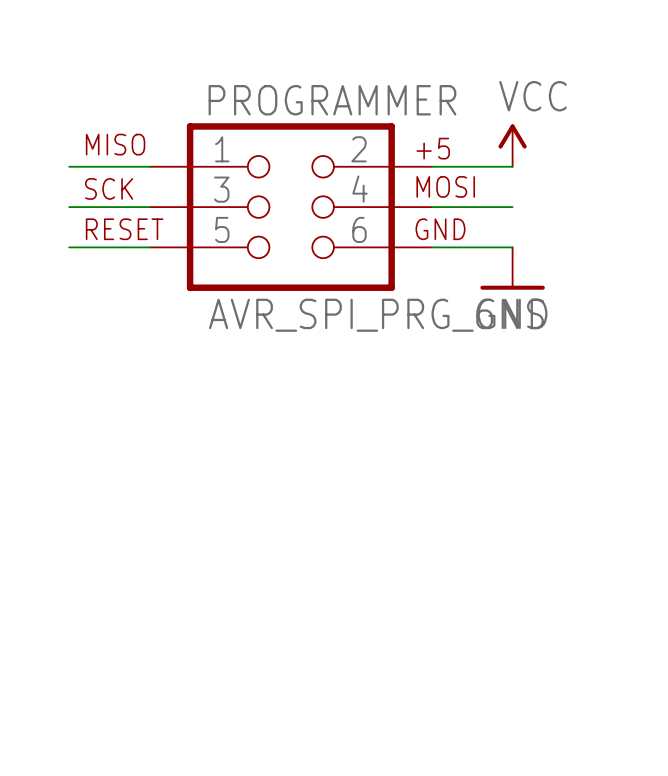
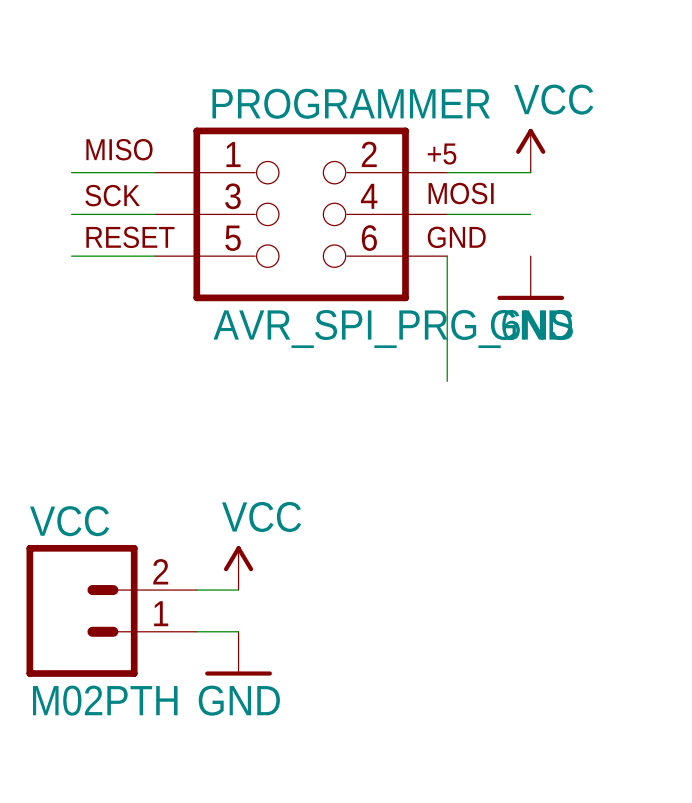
wire: (431, 247) (512, 247) -> (447, 256) (447, 381)
power symbol: none -> VCC (238, 568)
wire: none -> (196, 590) (238, 590)
VCC: none -> M02PTH (111, 610)
wire: none -> (196, 631) (238, 631)
power symbol: none -> GND (238, 653)

